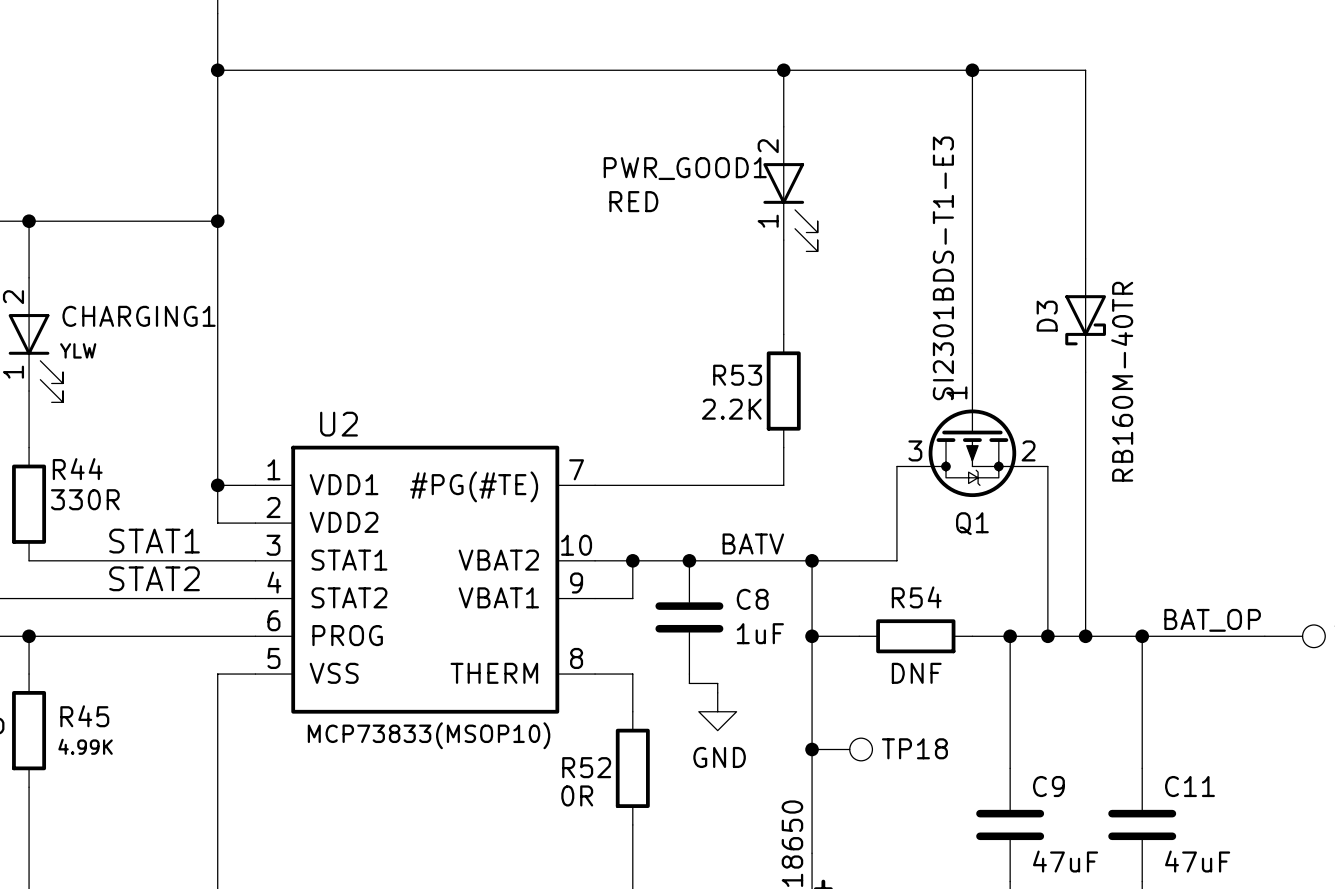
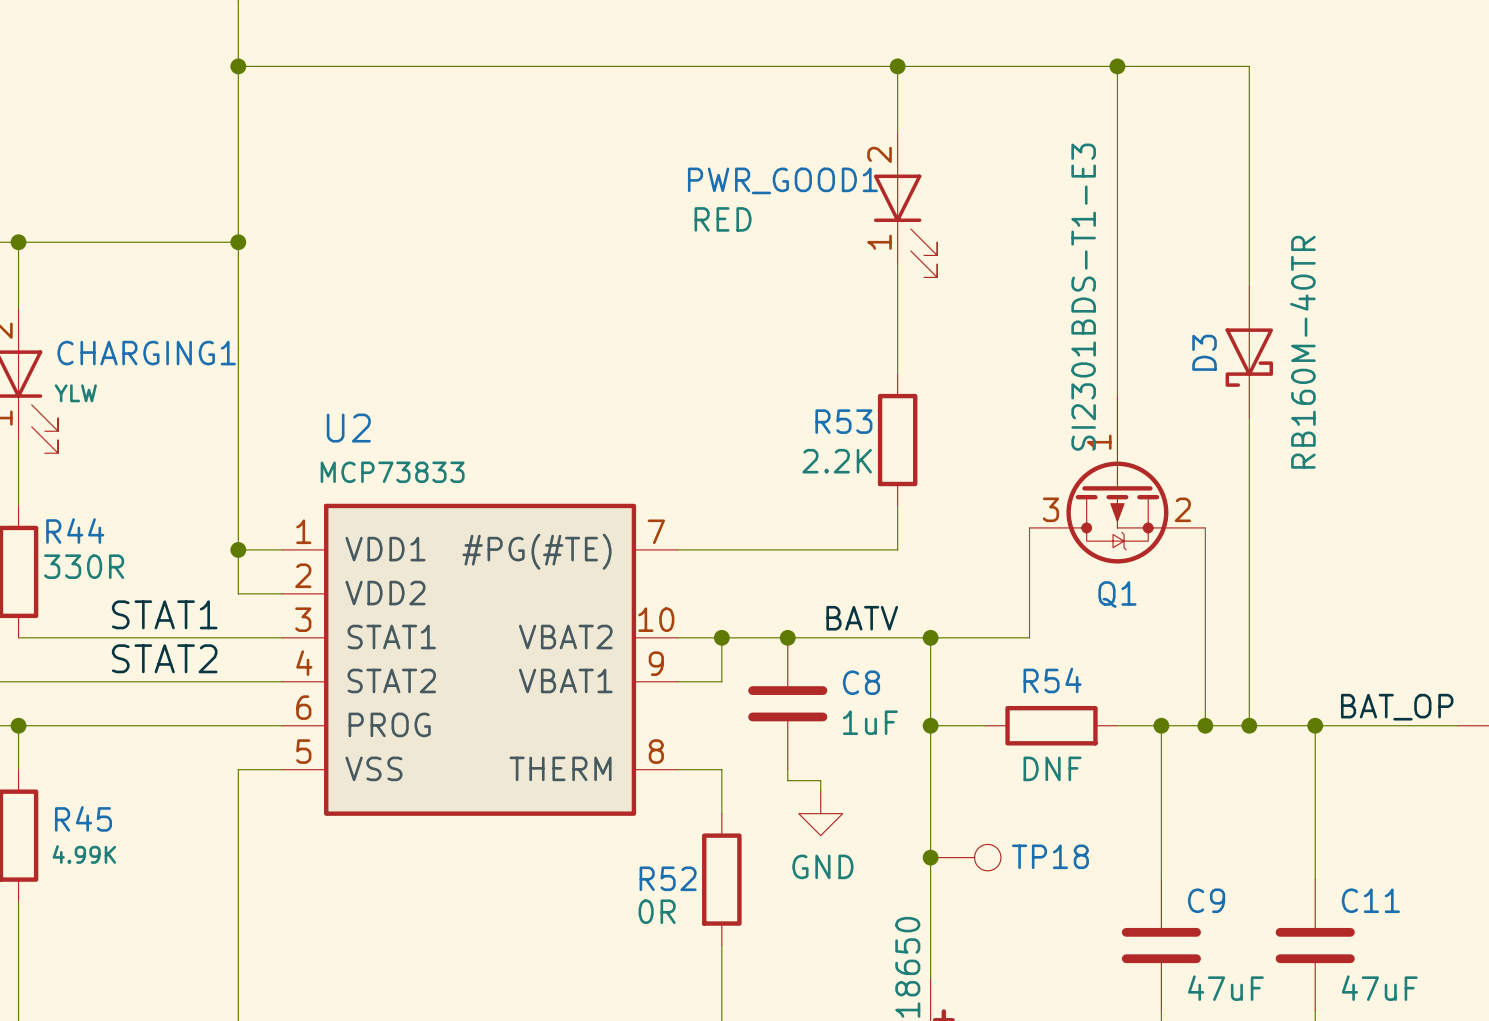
D3 value position: RB160M-40TR (1122, 381) -> RB160M-40TR (1302, 352)
U2 name position: U2 (339, 424) -> U2 (348, 428)
U2 value: MCP73833(MSOP10) (429, 735) -> MCP73833 (392, 472)

